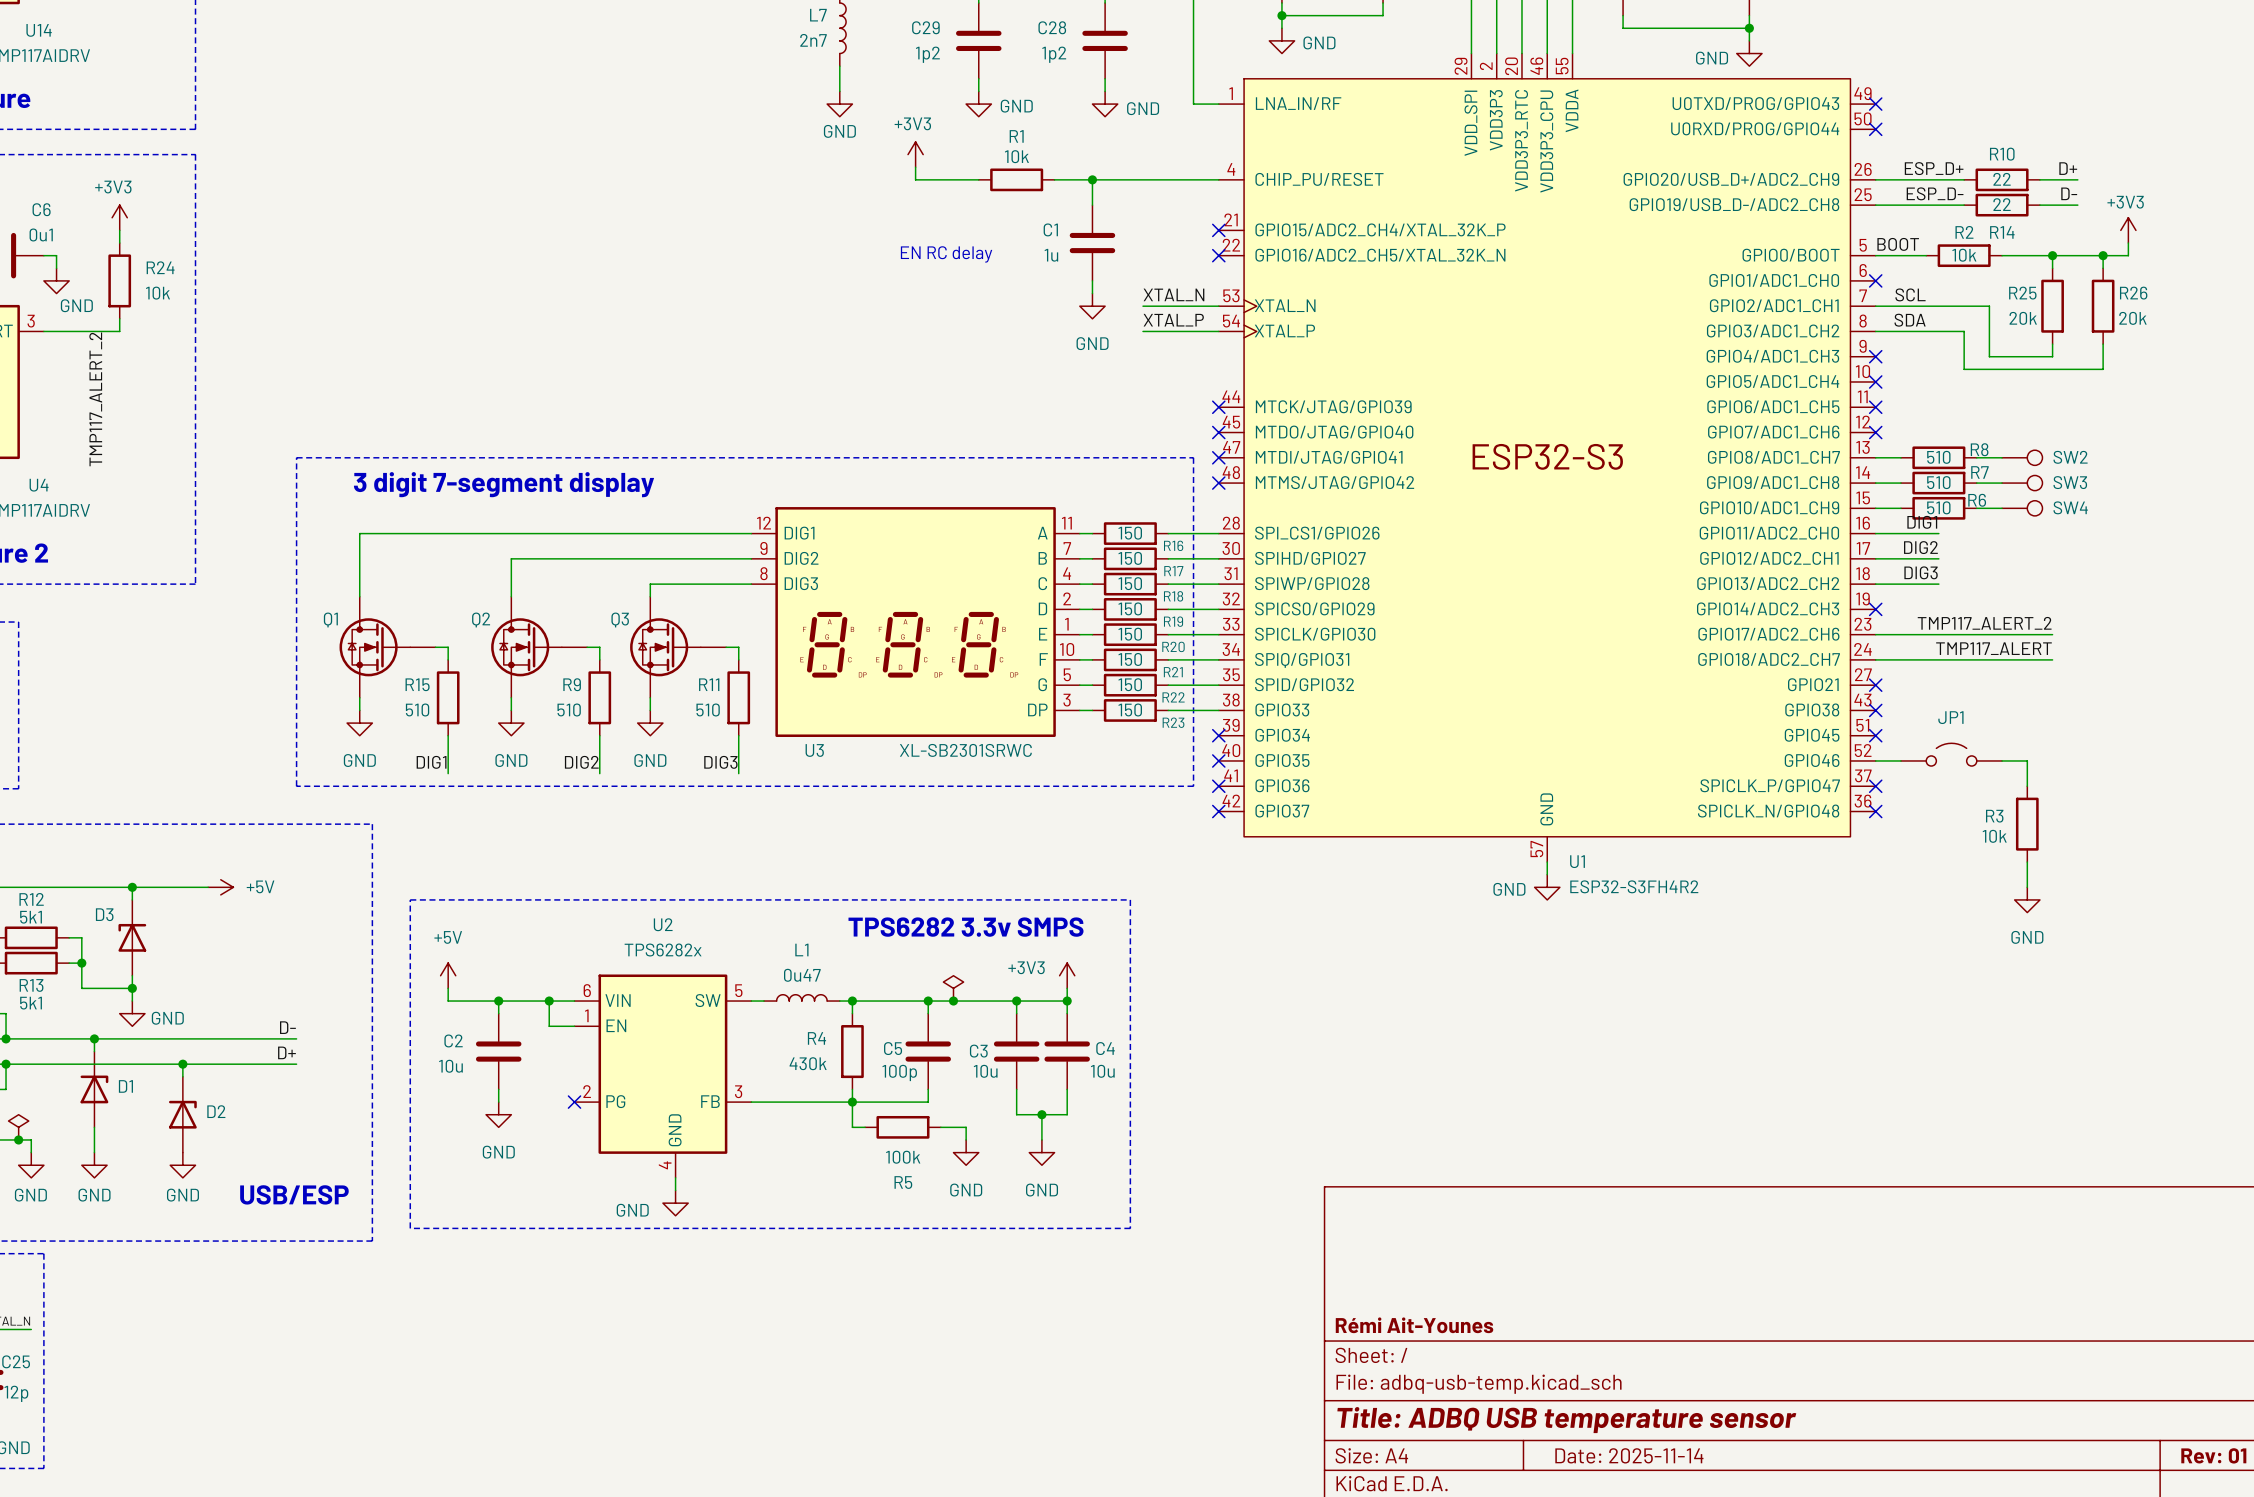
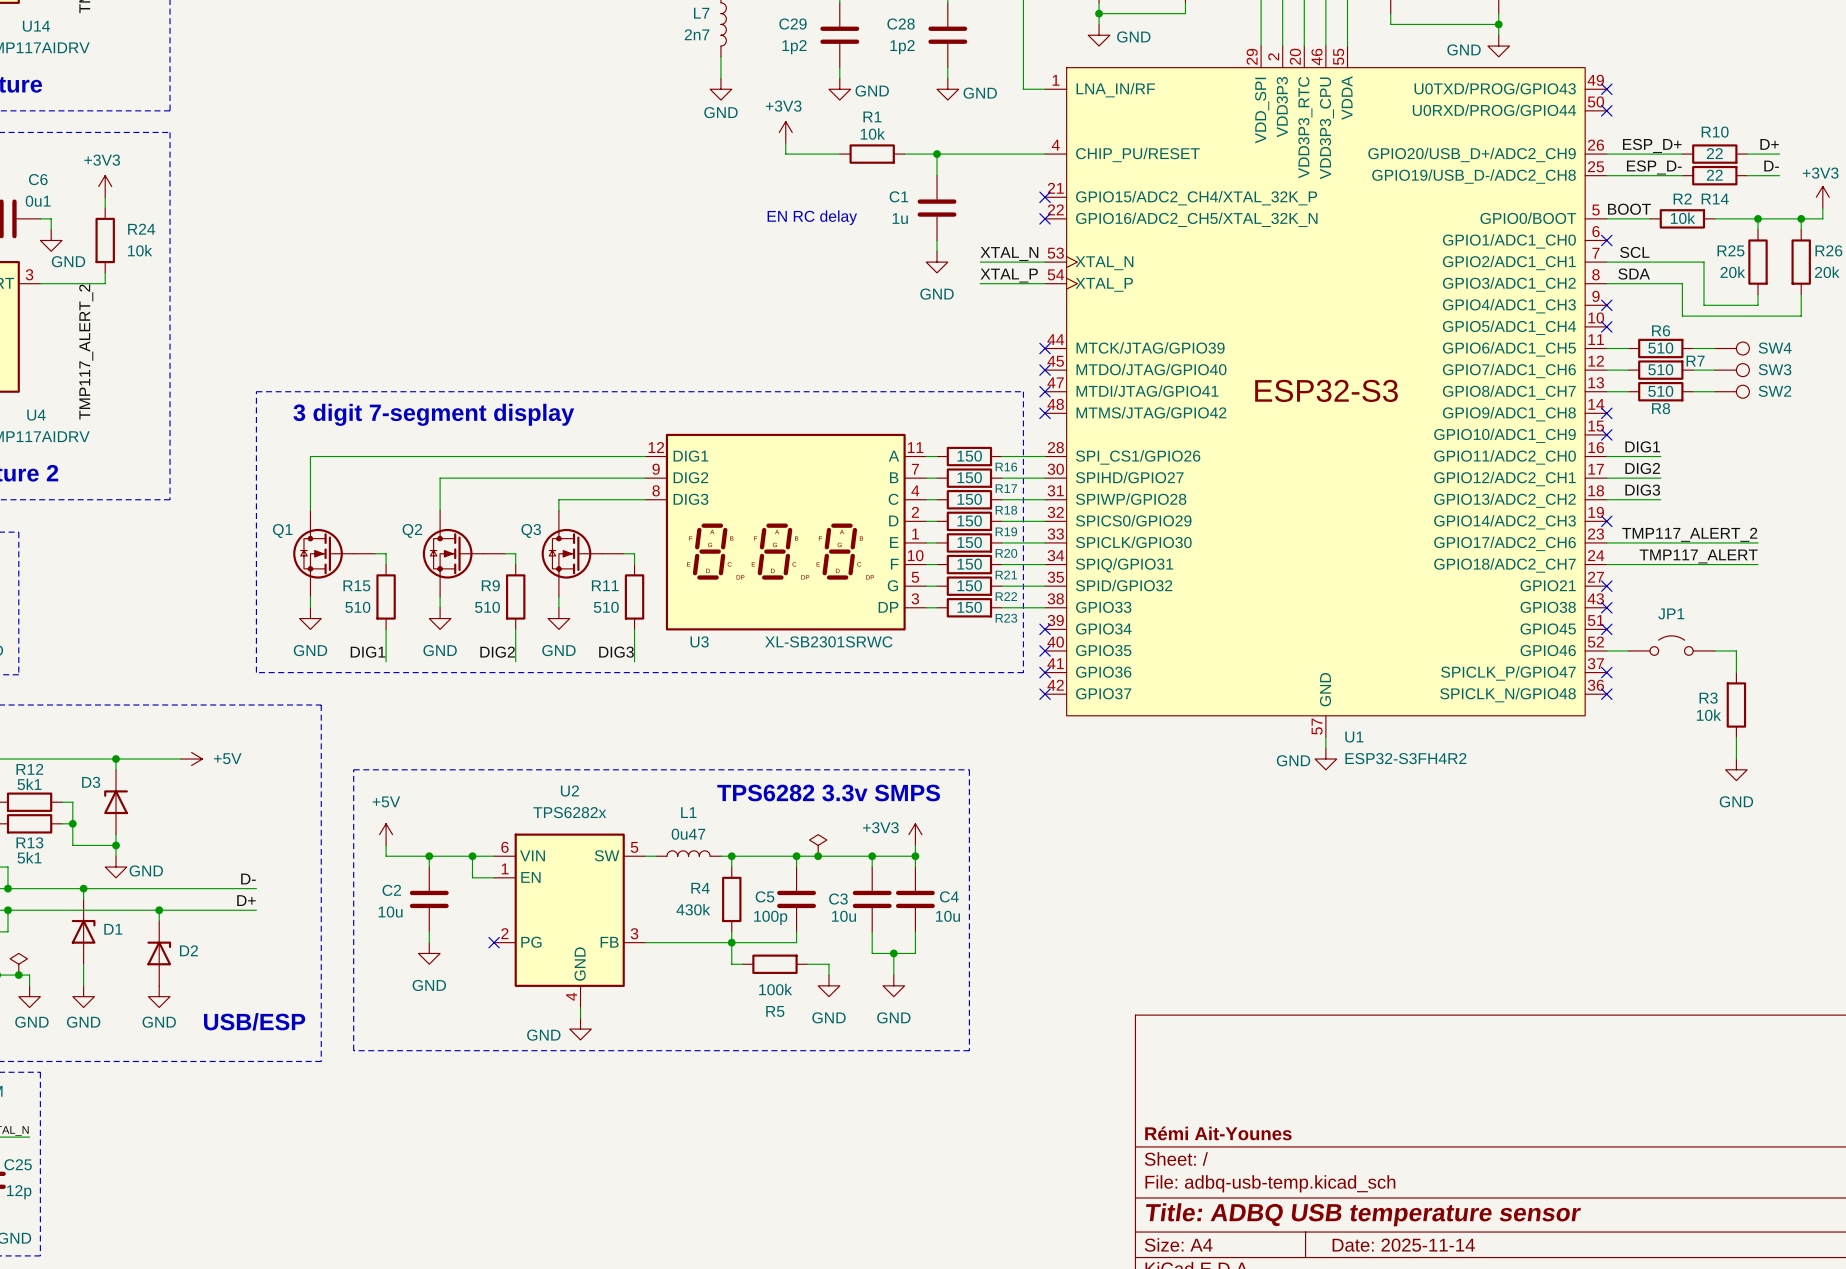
no-connect mark: (1875, 407) -> none
no-connect mark: (1875, 432) -> none
R8 name position: R8 (1979, 449) -> R8 (1661, 408)
wire: (1875, 483) (1900, 483) -> (1606, 348) (1628, 348)
no-connect mark: none -> (1606, 413)
R7 position: (1938, 483) -> (1660, 370)
wire: (1976, 483) (2002, 483) -> (1693, 348) (1714, 348)
SW3 position: (2022, 483) -> (1732, 370)
R6 name position: R6 (1977, 500) -> R6 (1661, 330)
wire: (1875, 508) (1900, 508) -> (1606, 370) (1628, 370)
no-connect mark: none -> (1606, 434)
R6 position: (1938, 508) -> (1660, 348)
wire: (1976, 508) (2002, 508) -> (1693, 370) (1714, 370)
SW4 position: (2022, 508) -> (1732, 348)

